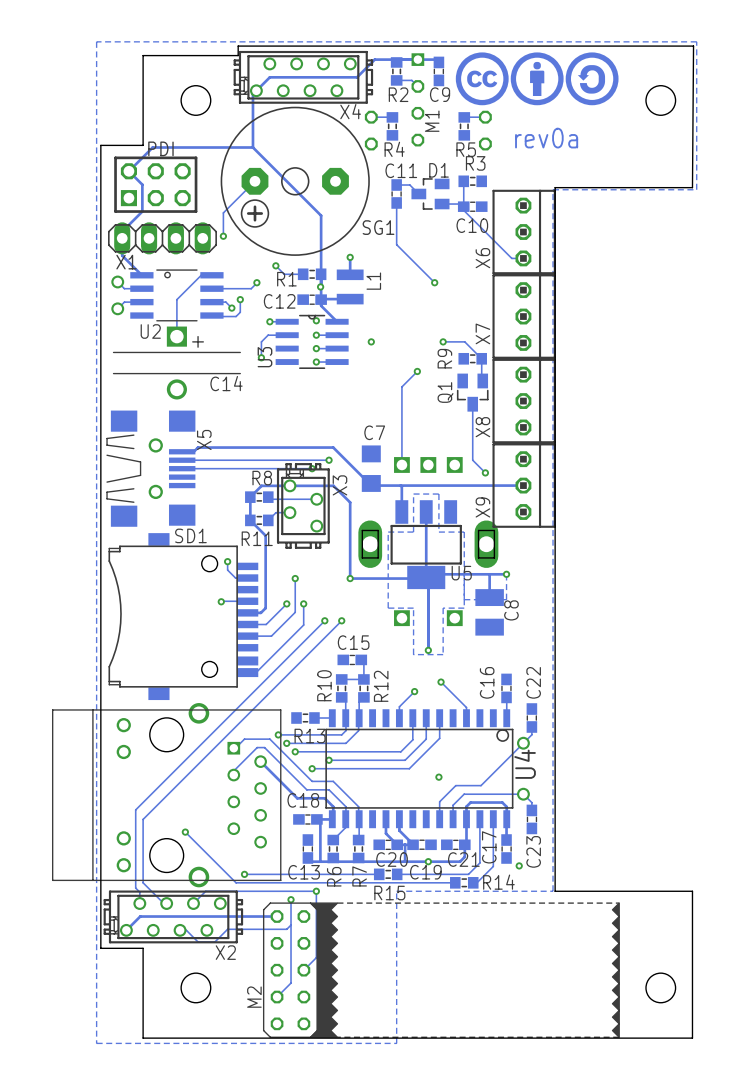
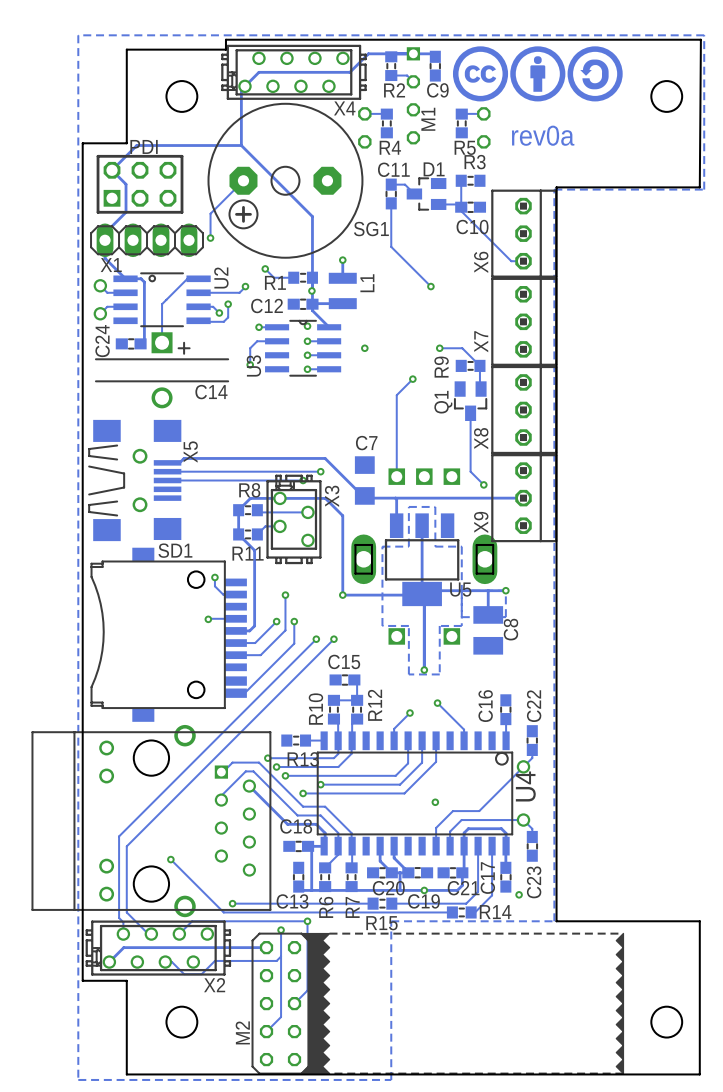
track: none -> (125, 278) (141, 278) (144, 282) (144, 340) (140, 343)
U2 name rotation: 0° (150, 331) -> 90° counterclockwise (221, 277)
U2 name position: U2 (150, 331) -> U2 (221, 277)
C24: none -> (131, 343)

